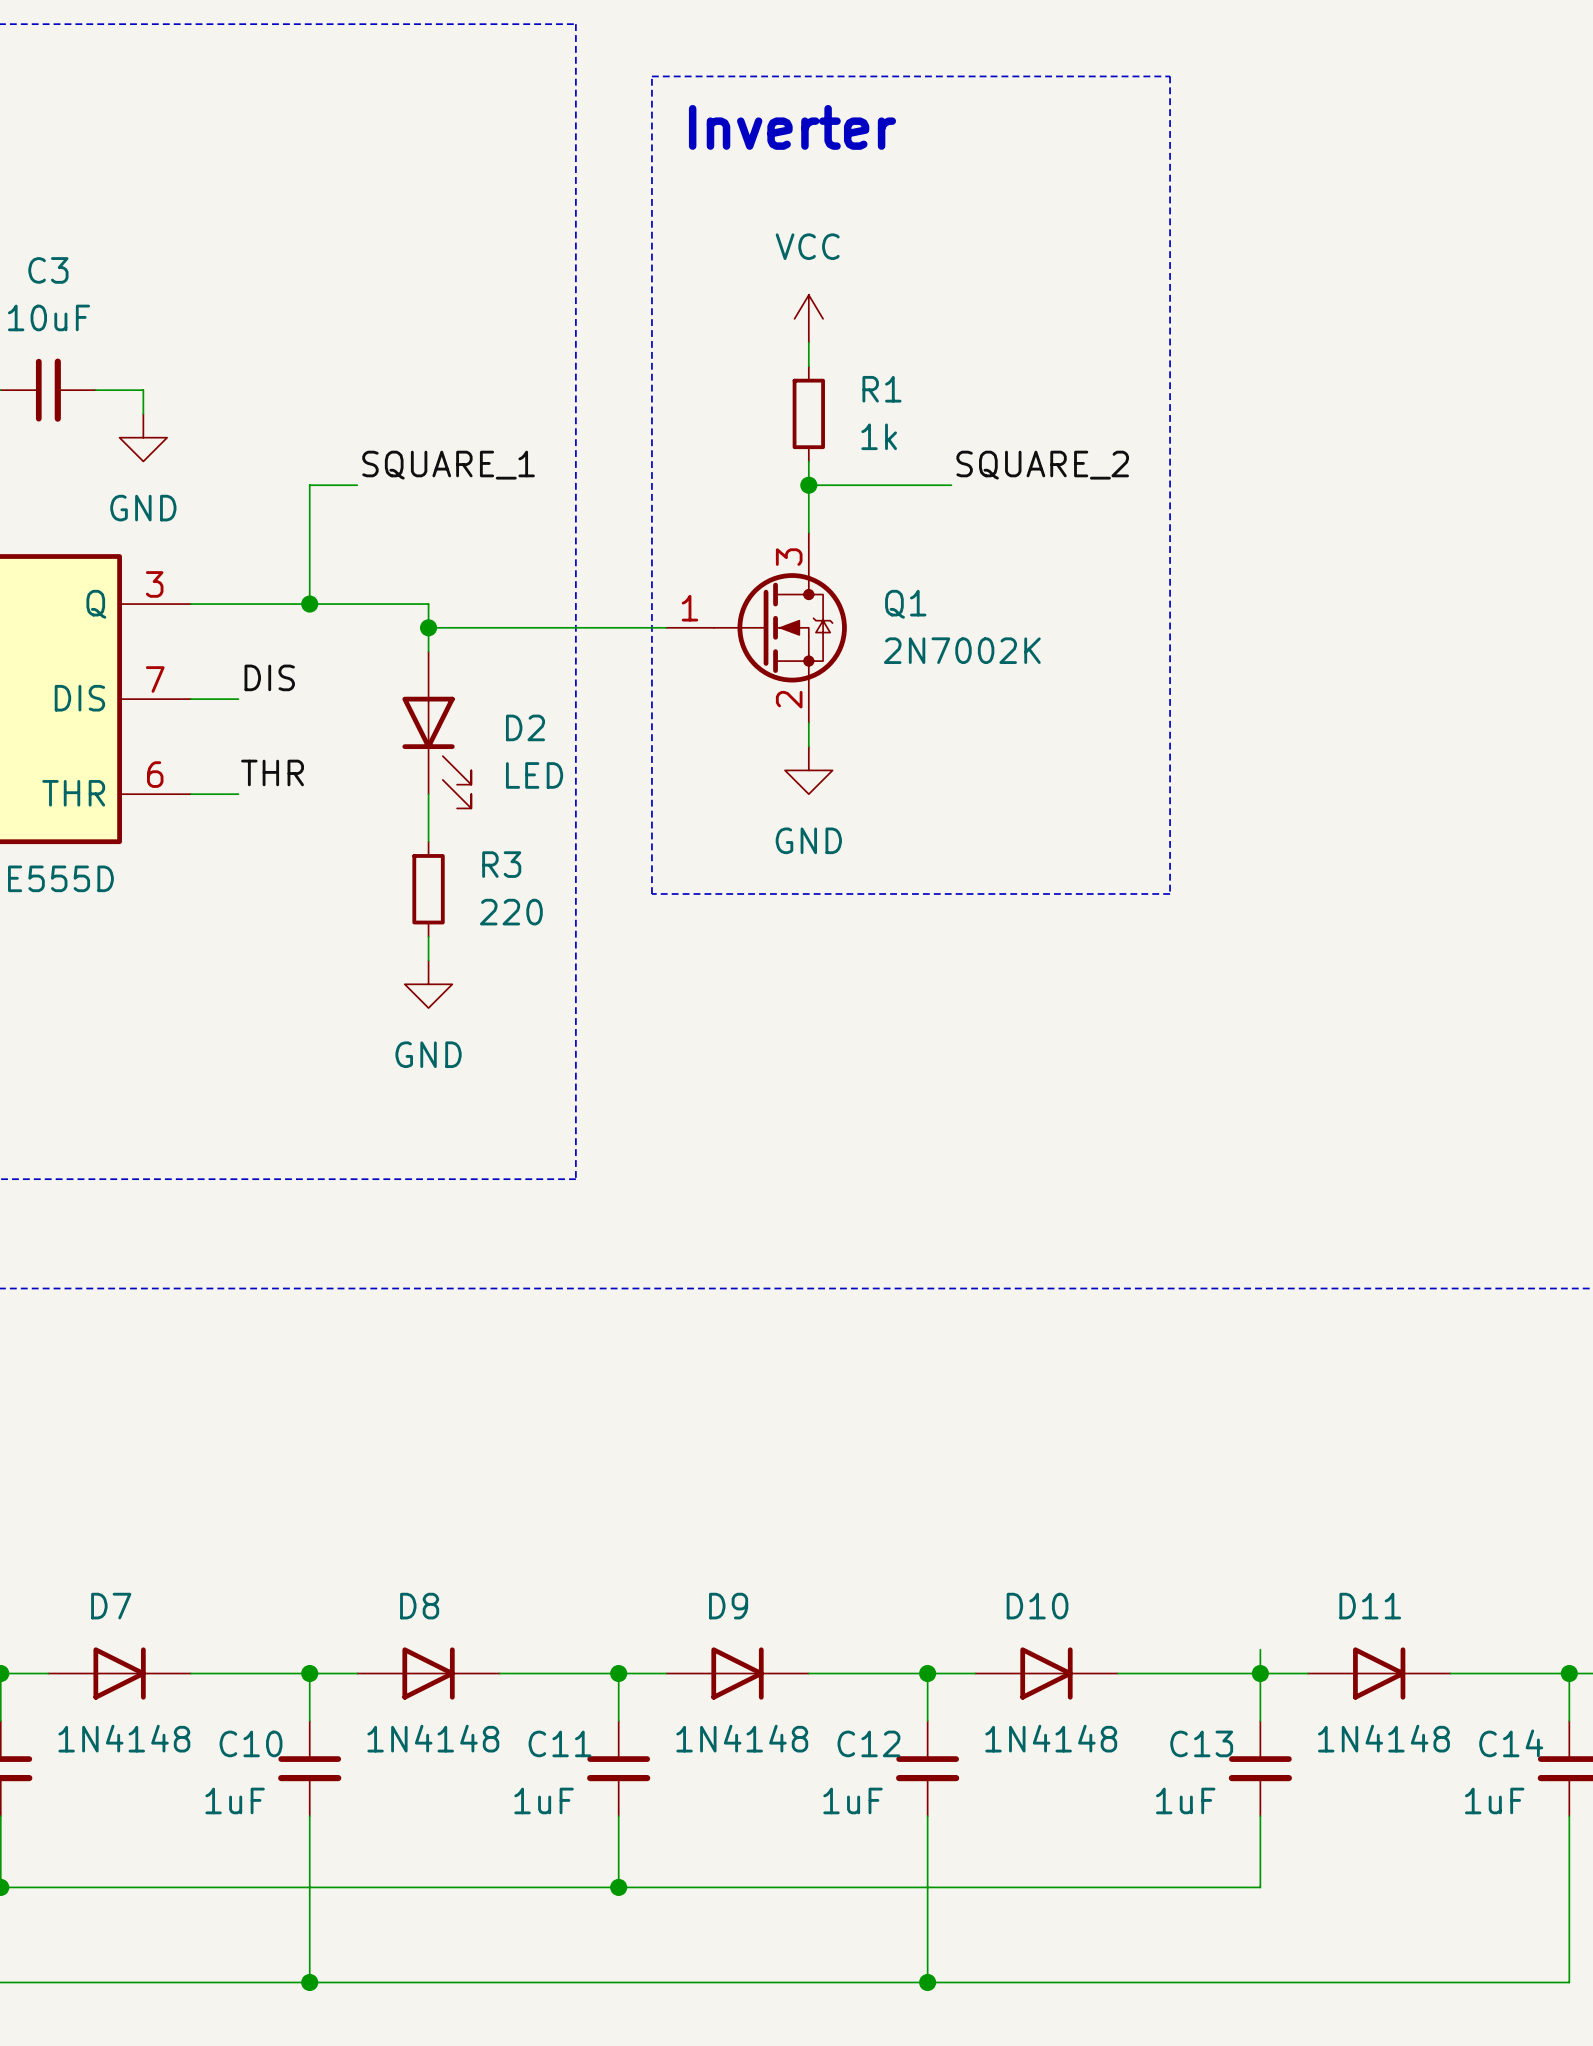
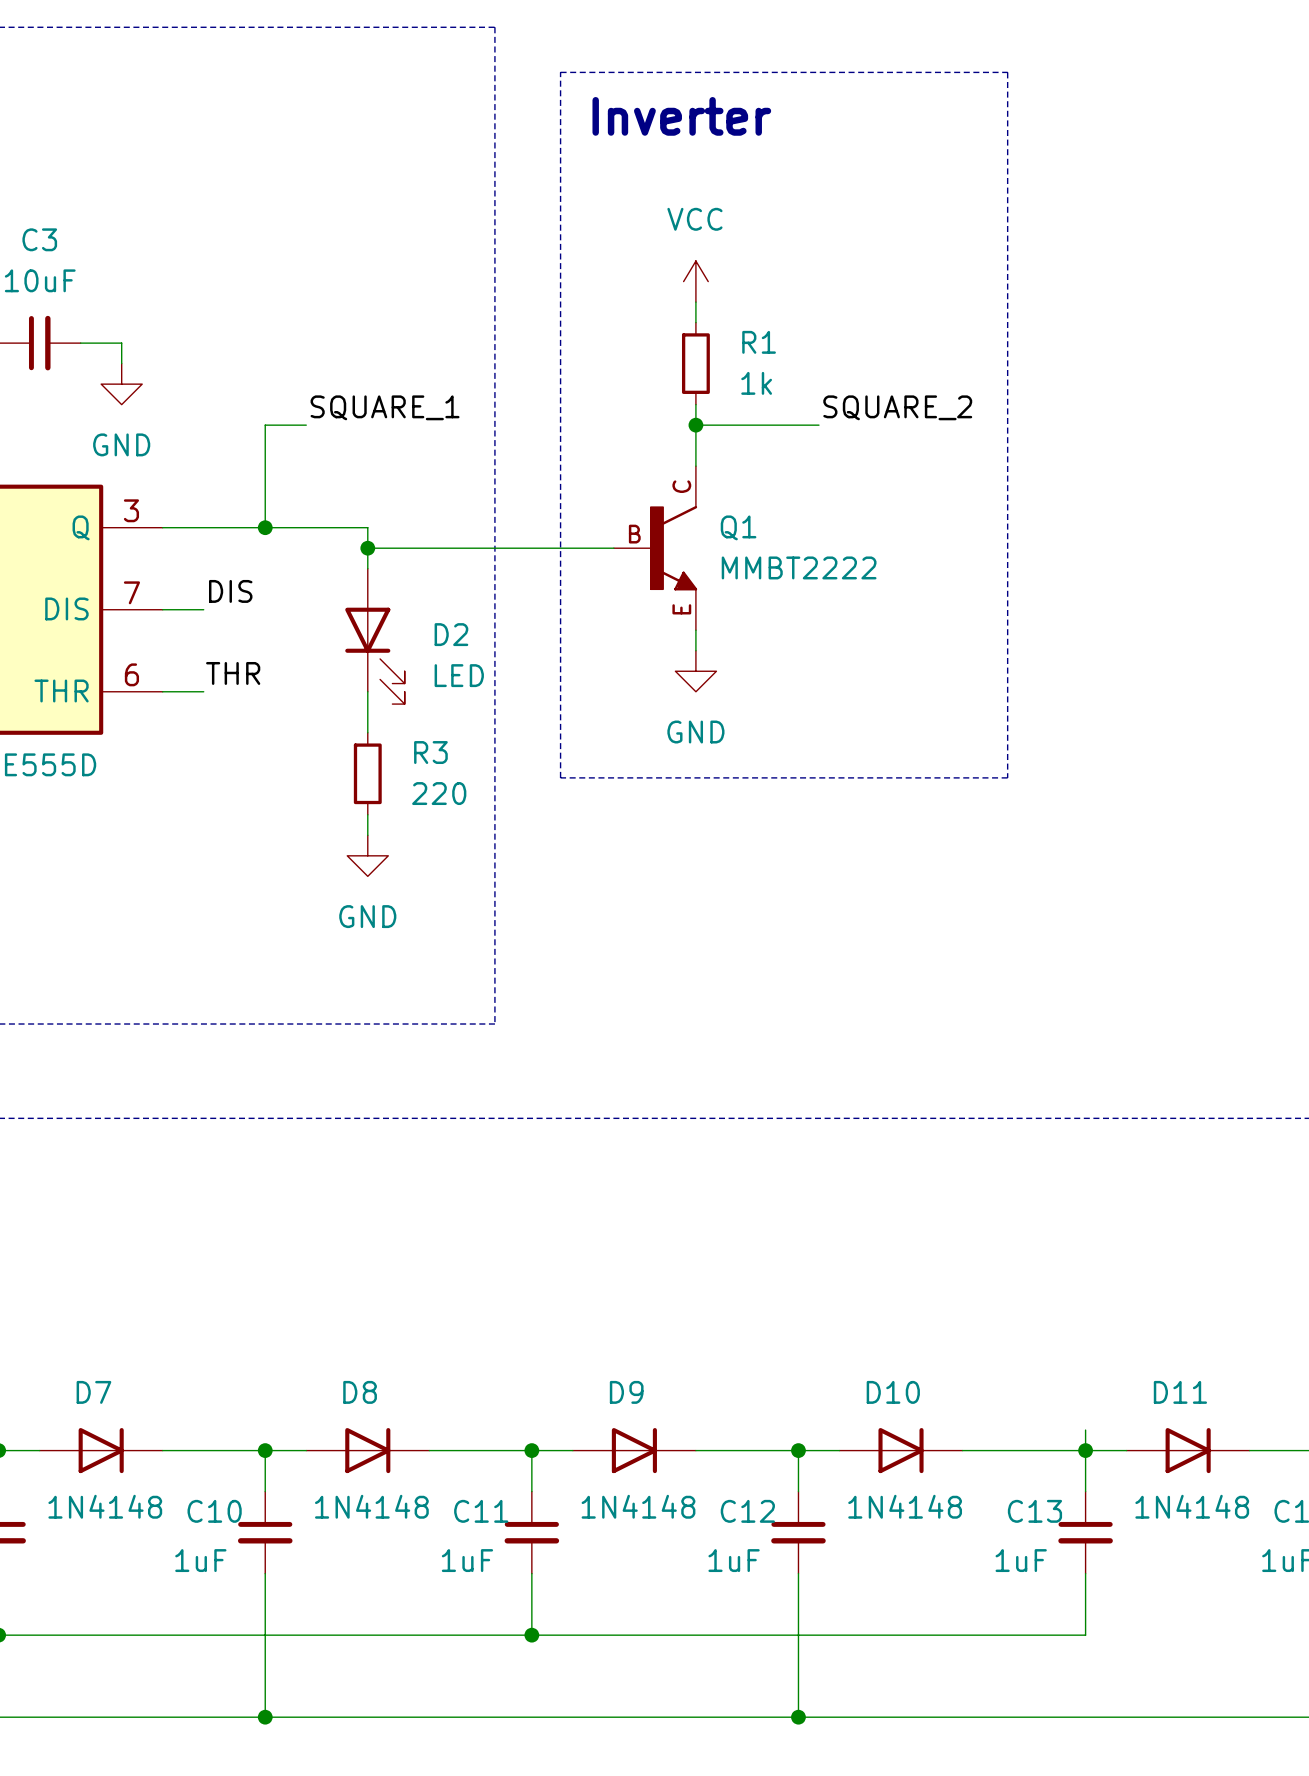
Q1 symbol: [666, 532, 847, 723] -> [613, 466, 698, 631]
Q1 name position: Q1 (905, 604) -> Q1 (738, 527)
Q1 value: 2N7002K (962, 650) -> MMBT2222 (799, 567)

